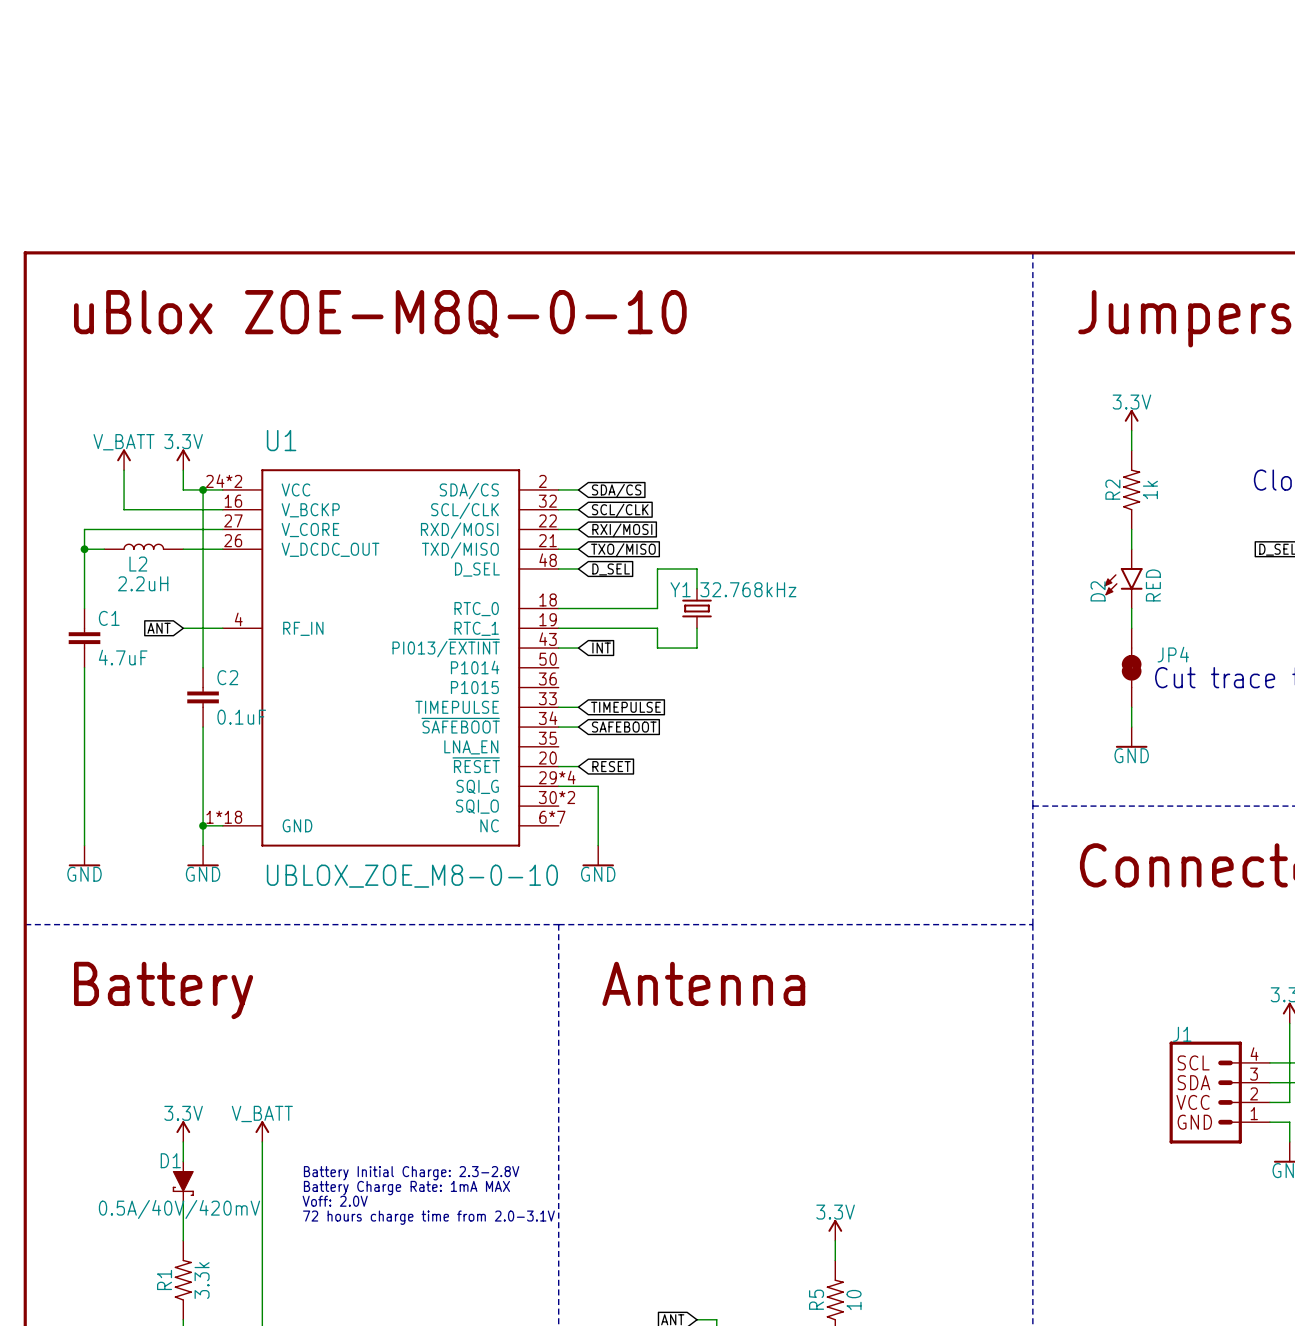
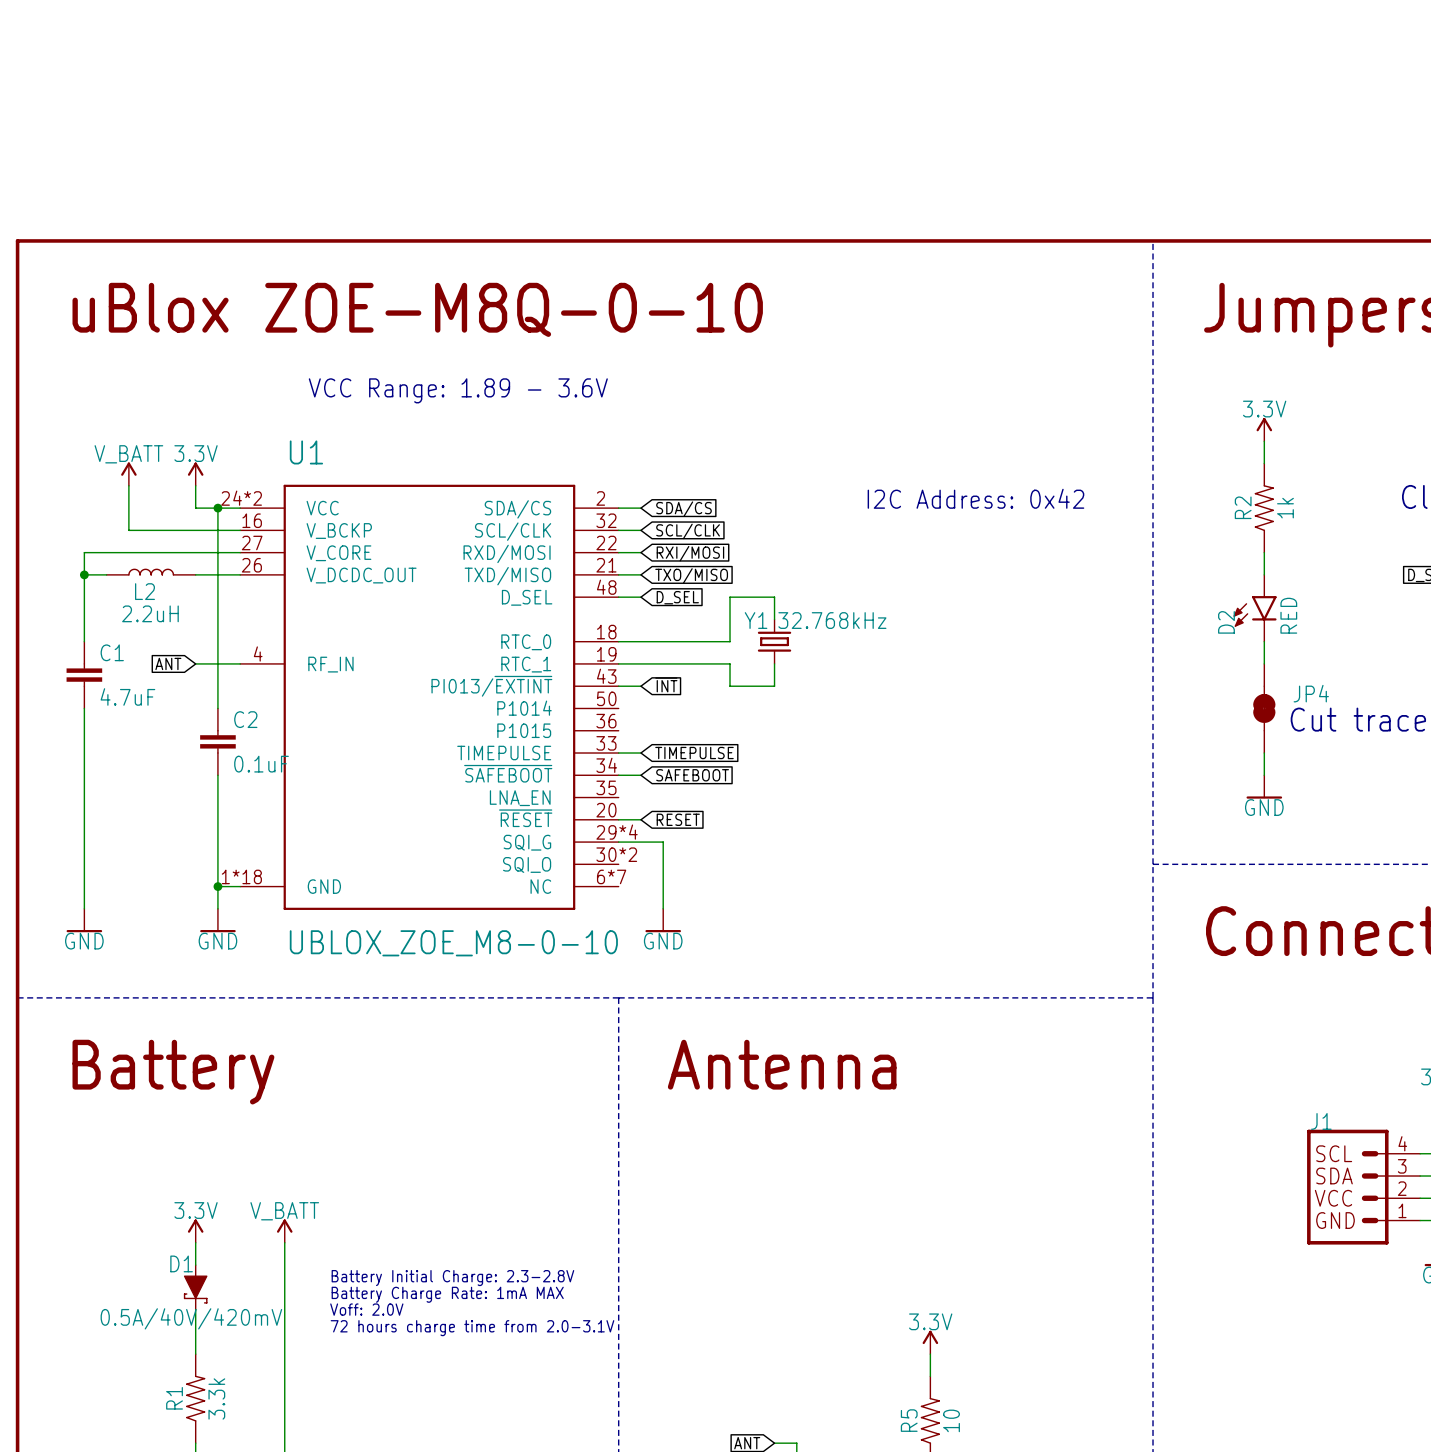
text: none -> VCC Range: 1.89 - 3.6V (458, 390)
text: none -> I2C Address: 0x42 (975, 498)

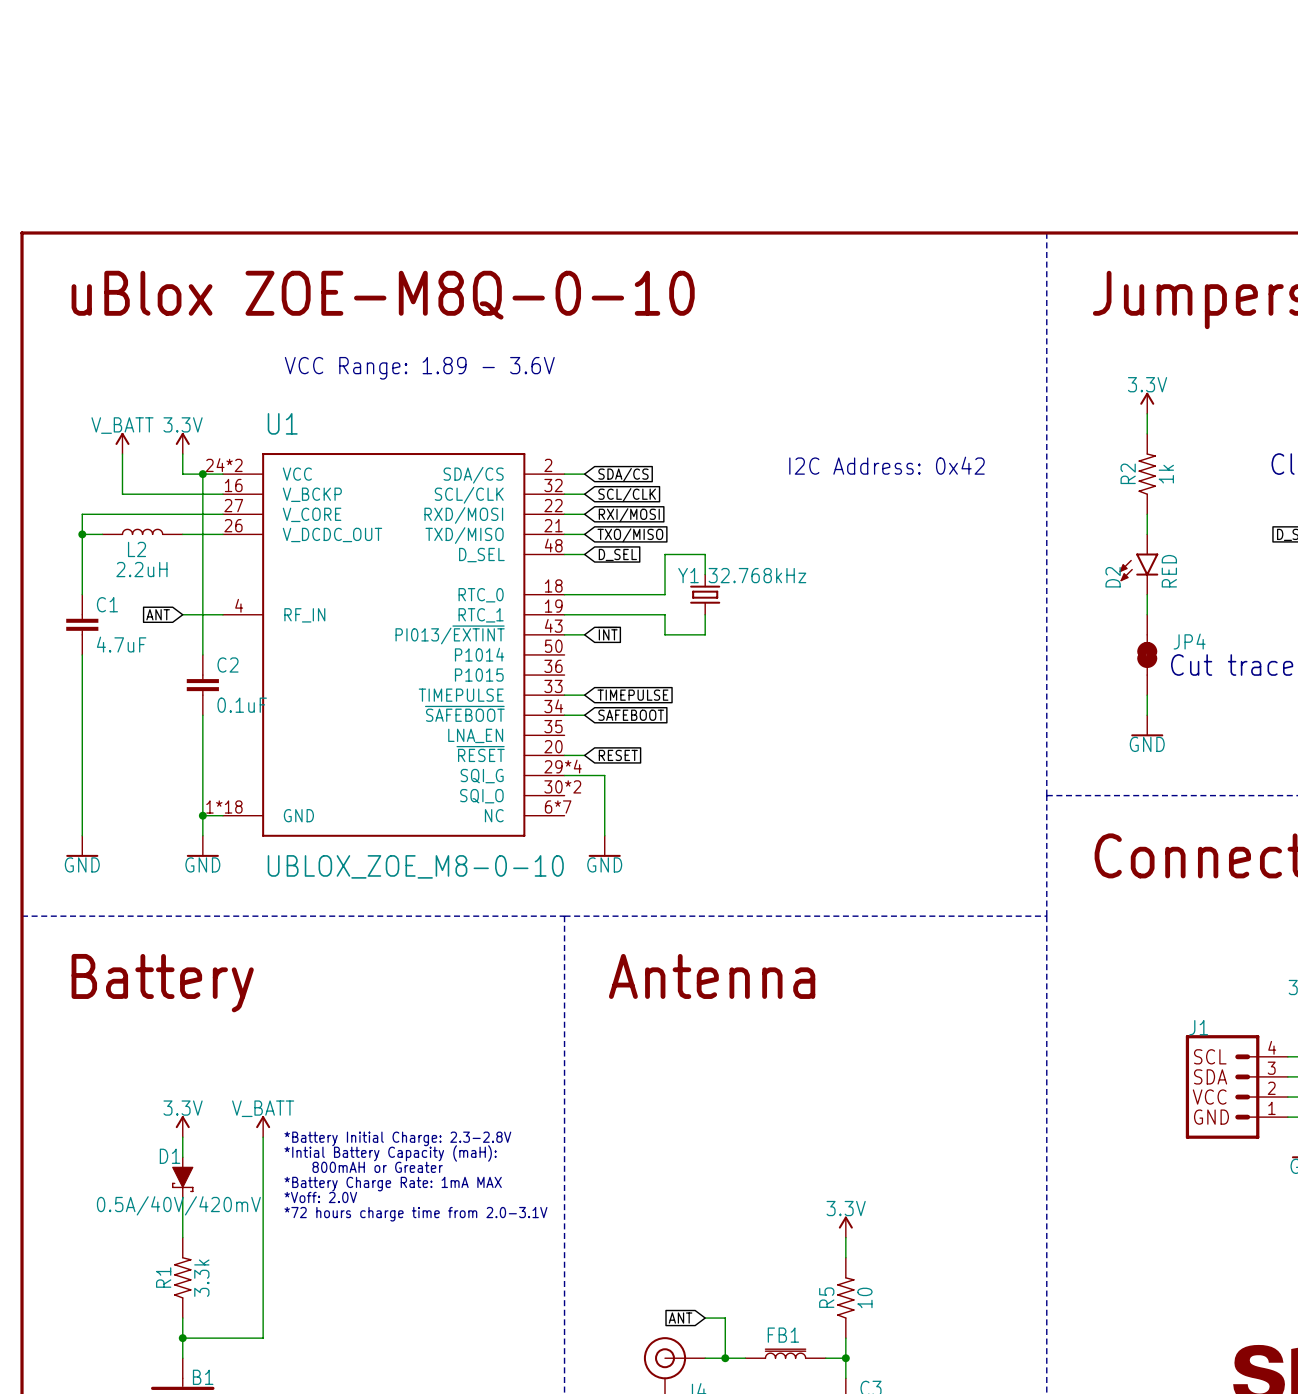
text: none -> *Battery Initial Charge: 2.3-2.8V (397, 1138)
text: none -> *Intial Battery Capacity (maH): (390, 1153)
text: none -> 800mAH or Greater (377, 1167)
text: Battery Initial Charge: 2.3-2.8V (452, 1278) -> none
text: Battery Charge Rate: 1mA MAX (447, 1294) -> *Battery Charge Rate: 1mA MAX (393, 1184)
text: Voff: 2.0V (366, 1309) -> *Voff: 2.0V (320, 1197)
text: 72 hours charge time from 2.0-3.1V (472, 1328) -> *72 hours charge time from 2.0-3.1V (415, 1214)

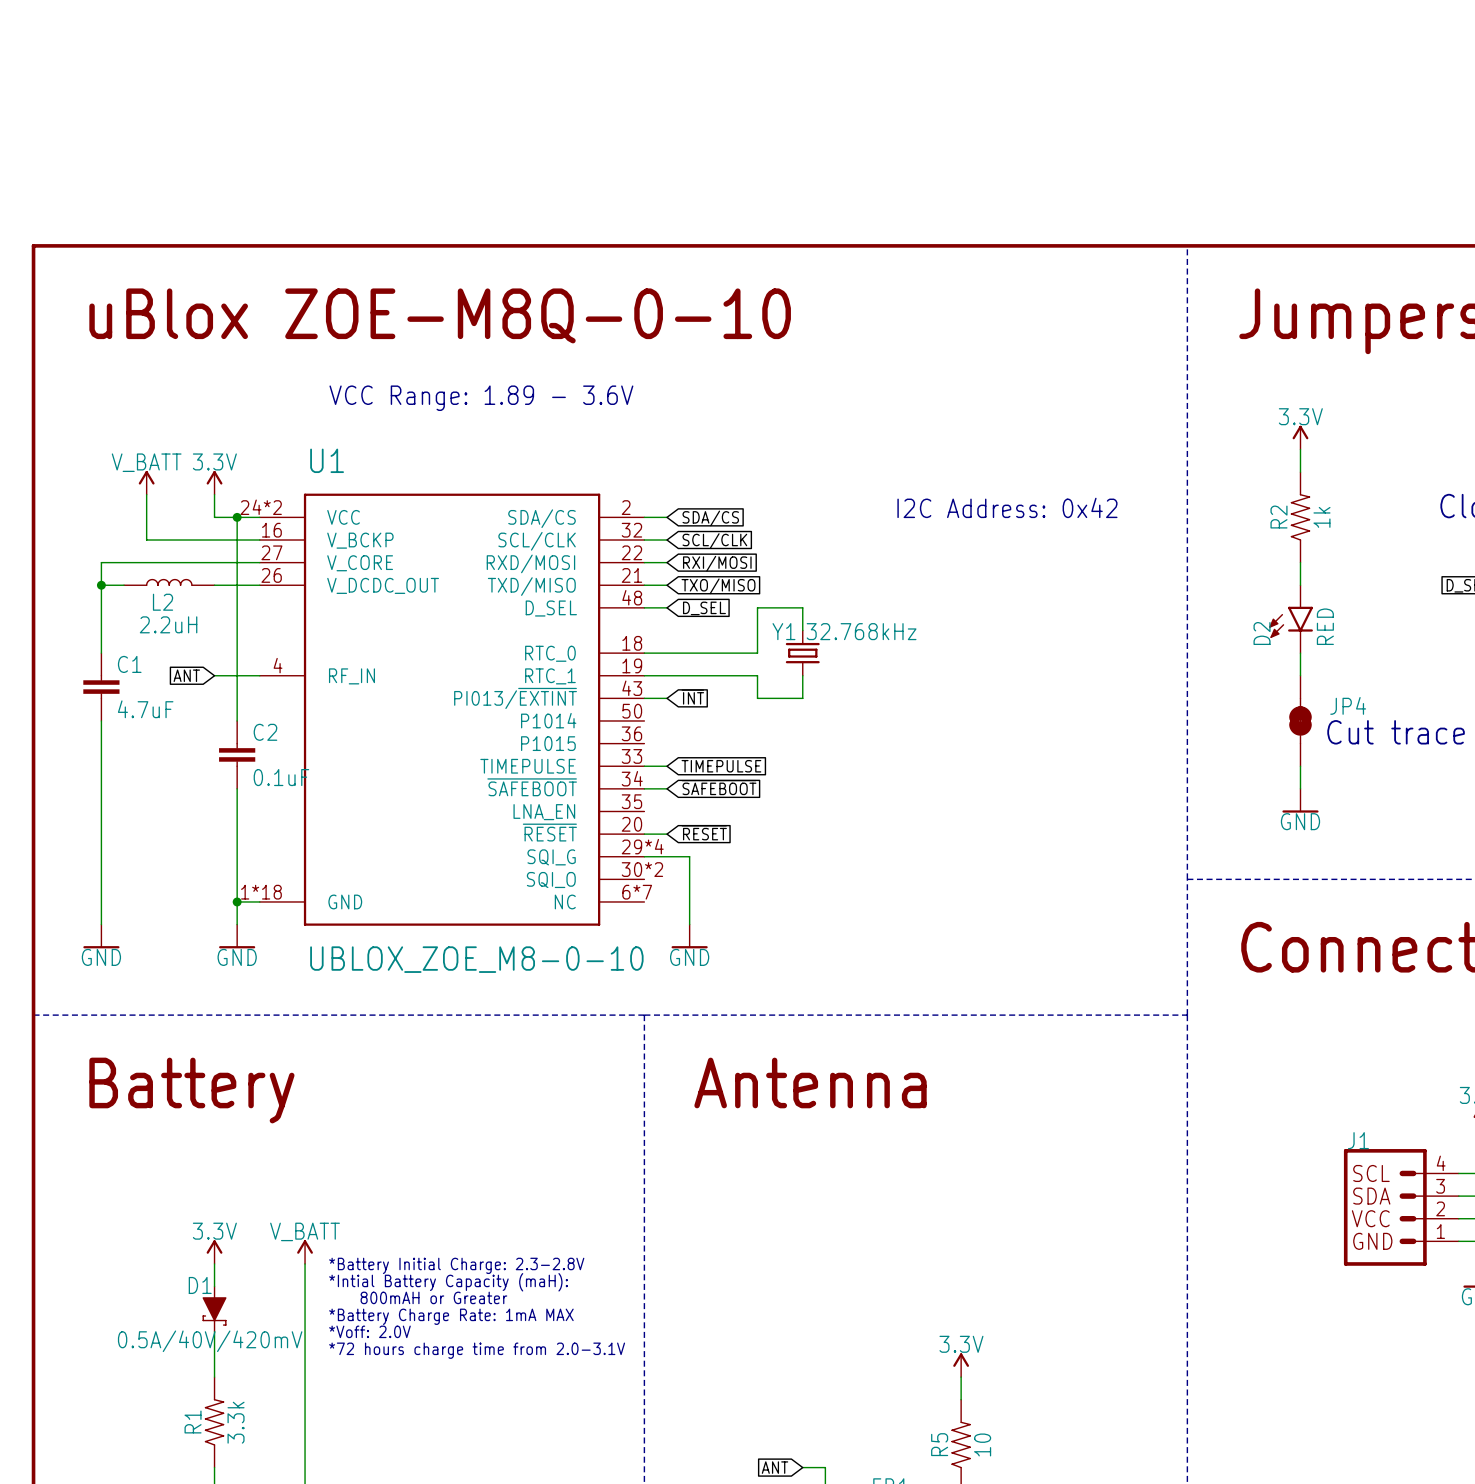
global label: SAFEBOOT (631, 715) -> ~{SAFEBOOT} (719, 787)
global label: RESET (618, 755) -> ~{RESET} (704, 832)

